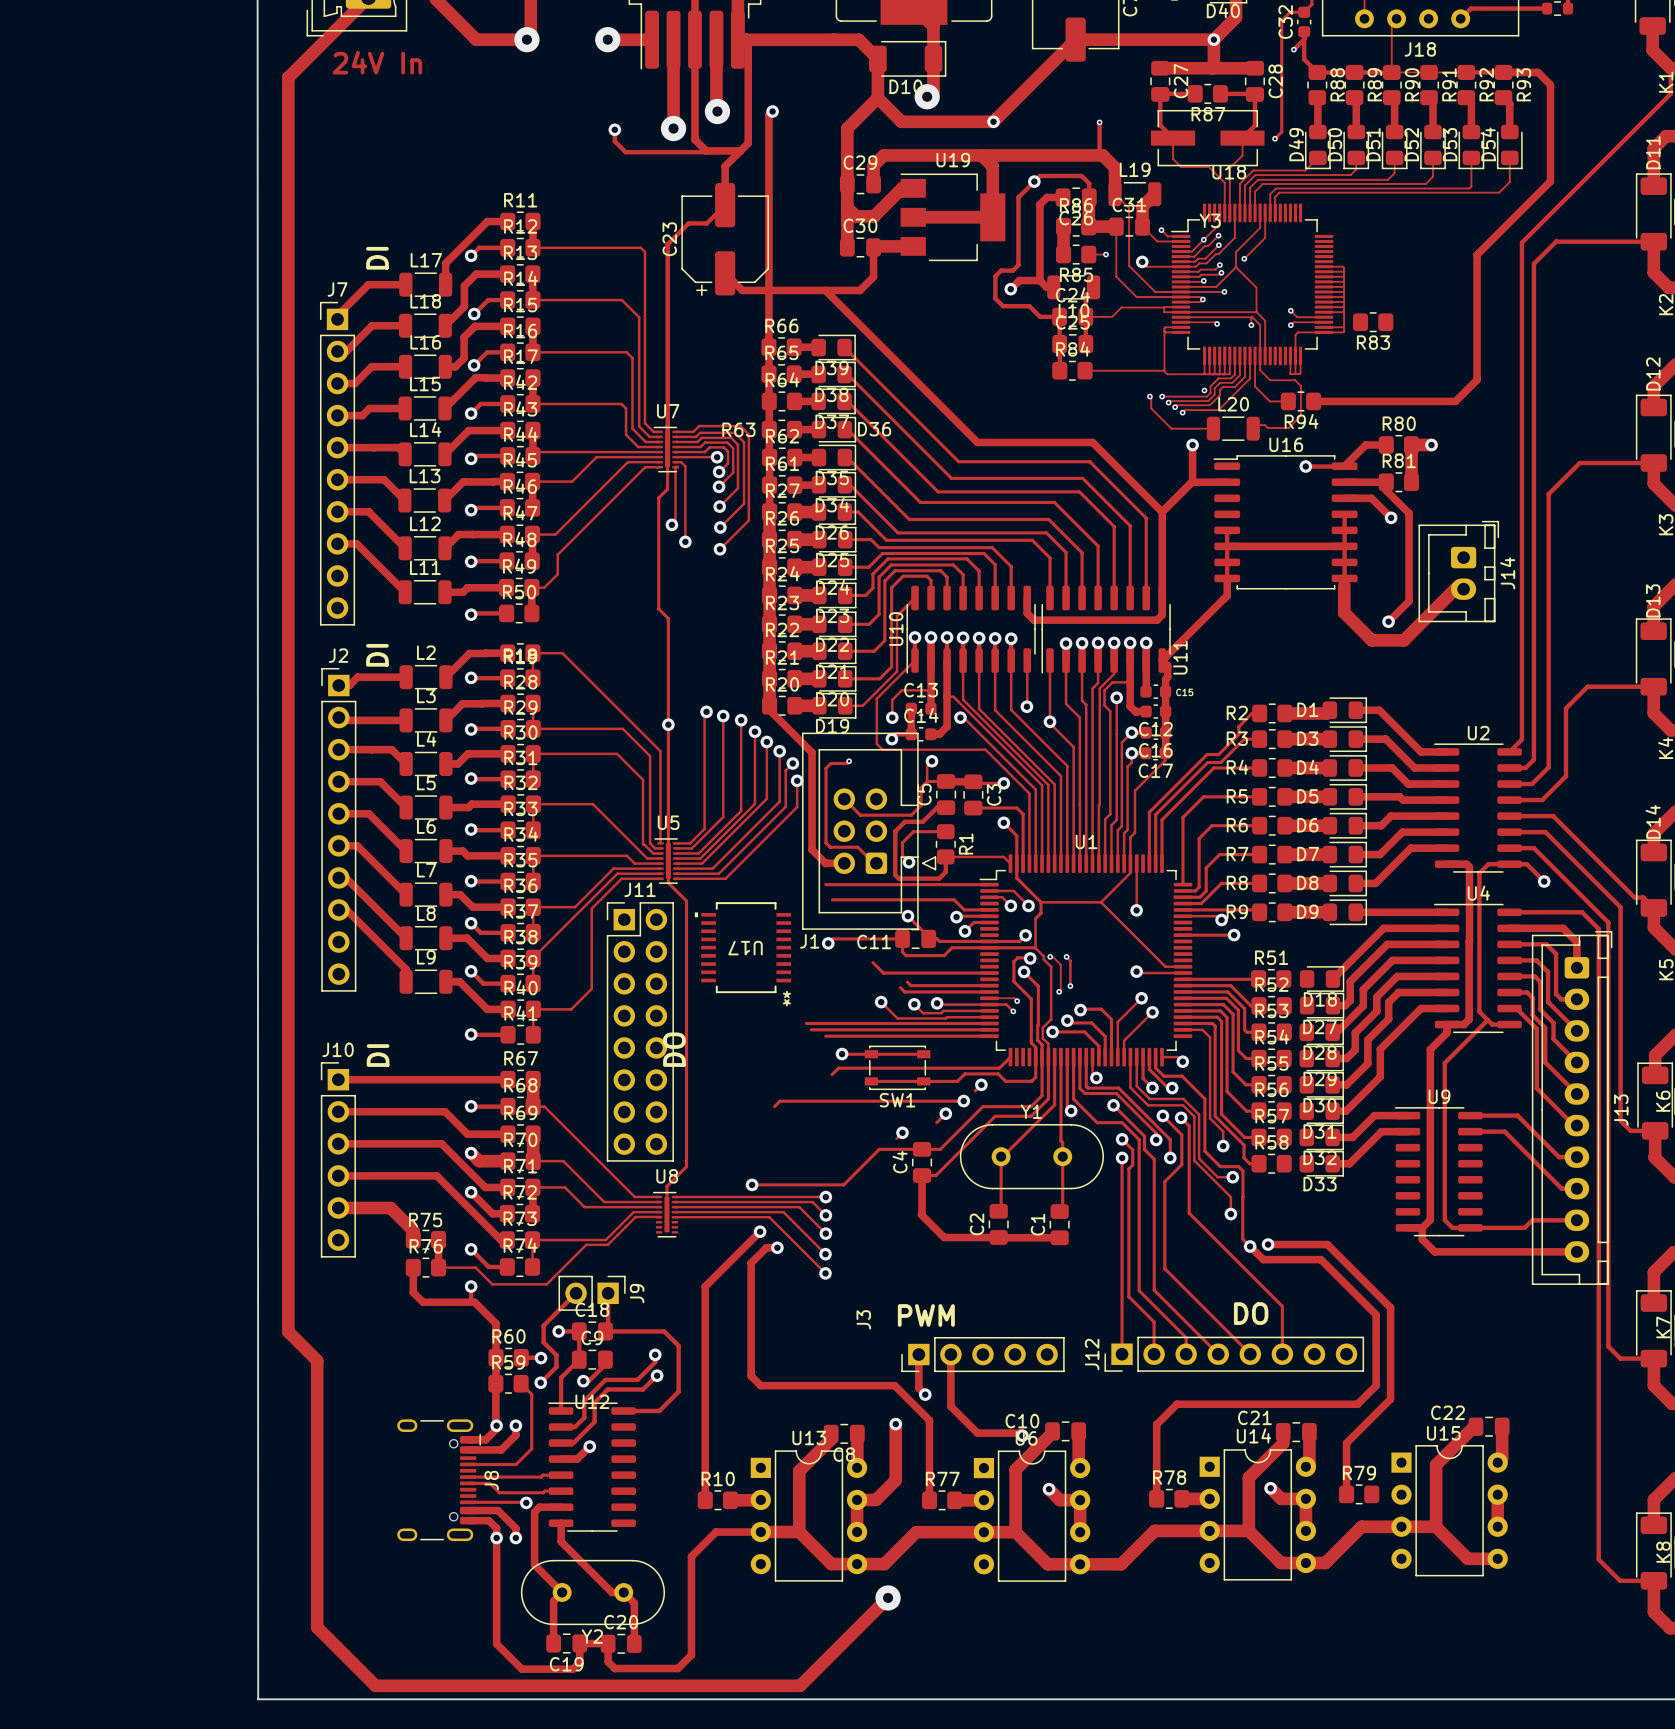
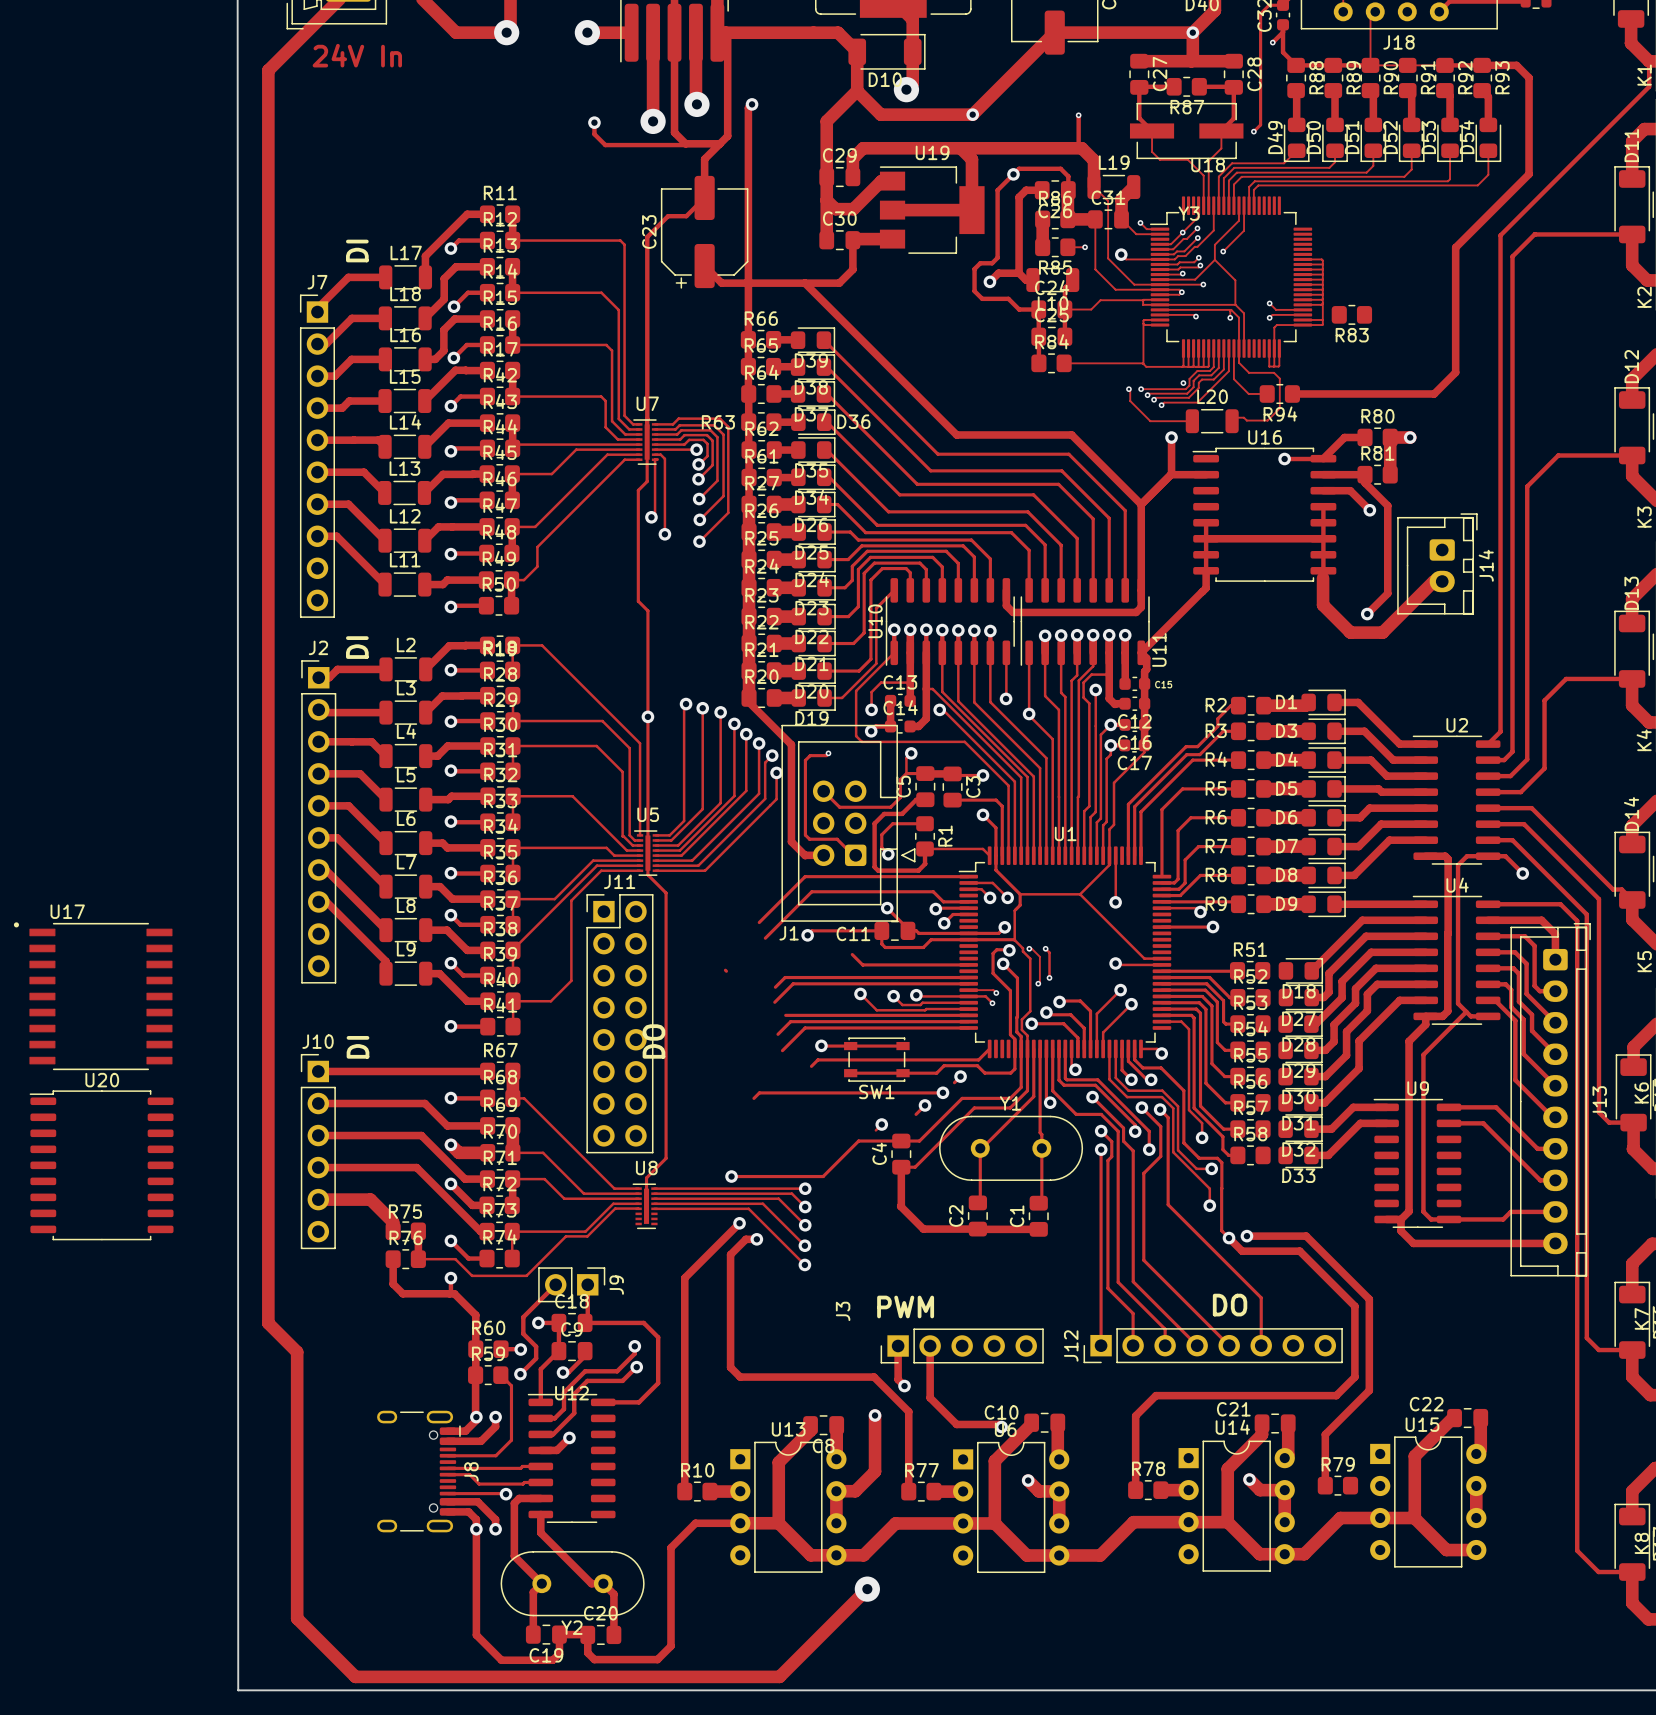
track: none -> (805, 876) (759, 922)
track: none -> (811, 891) (765, 938)
U17 footprint: [694, 902, 792, 994] -> [13, 922, 173, 1071]
U17 name position: U17 (745, 948) -> U17 (67, 911)
track: none -> (725, 970) (726, 971)
track: (907, 982) (910, 985) -> (775, 987) (785, 977) (890, 977)
track: (900, 987) (904, 991) -> (774, 1002) (793, 983) (884, 983)
track: none -> (790, 1021) (777, 1034)
track: none -> (805, 1027) (782, 1050)
U20: none -> (101, 1165)

